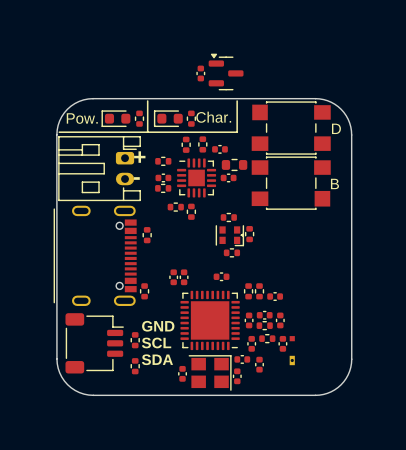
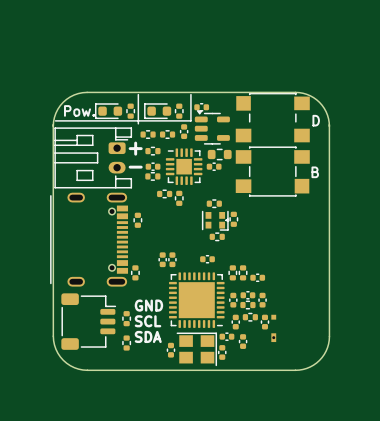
part: (226, 71) -> none
part: (200, 73) -> none
line: none -> (190, 94) (190, 120) (55, 120)
line: (237, 100) (237, 132) (59, 132) -> none
part footprint: [251, 101, 331, 155] -> [235, 93, 310, 143]
part: none -> (201, 107)
text: Char. (213, 117) -> none
part: none -> (212, 127)
part: none -> (184, 131)
part: none -> (148, 134)
part rotation: 0° (186, 144) -> 90° clockwise (167, 134)
part: (202, 144) -> none
part: (219, 149) -> none

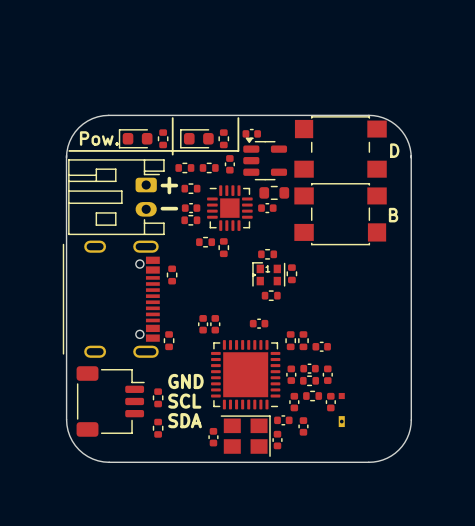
part footprint: [202, 210, 229, 231] -> [252, 262, 286, 287]

